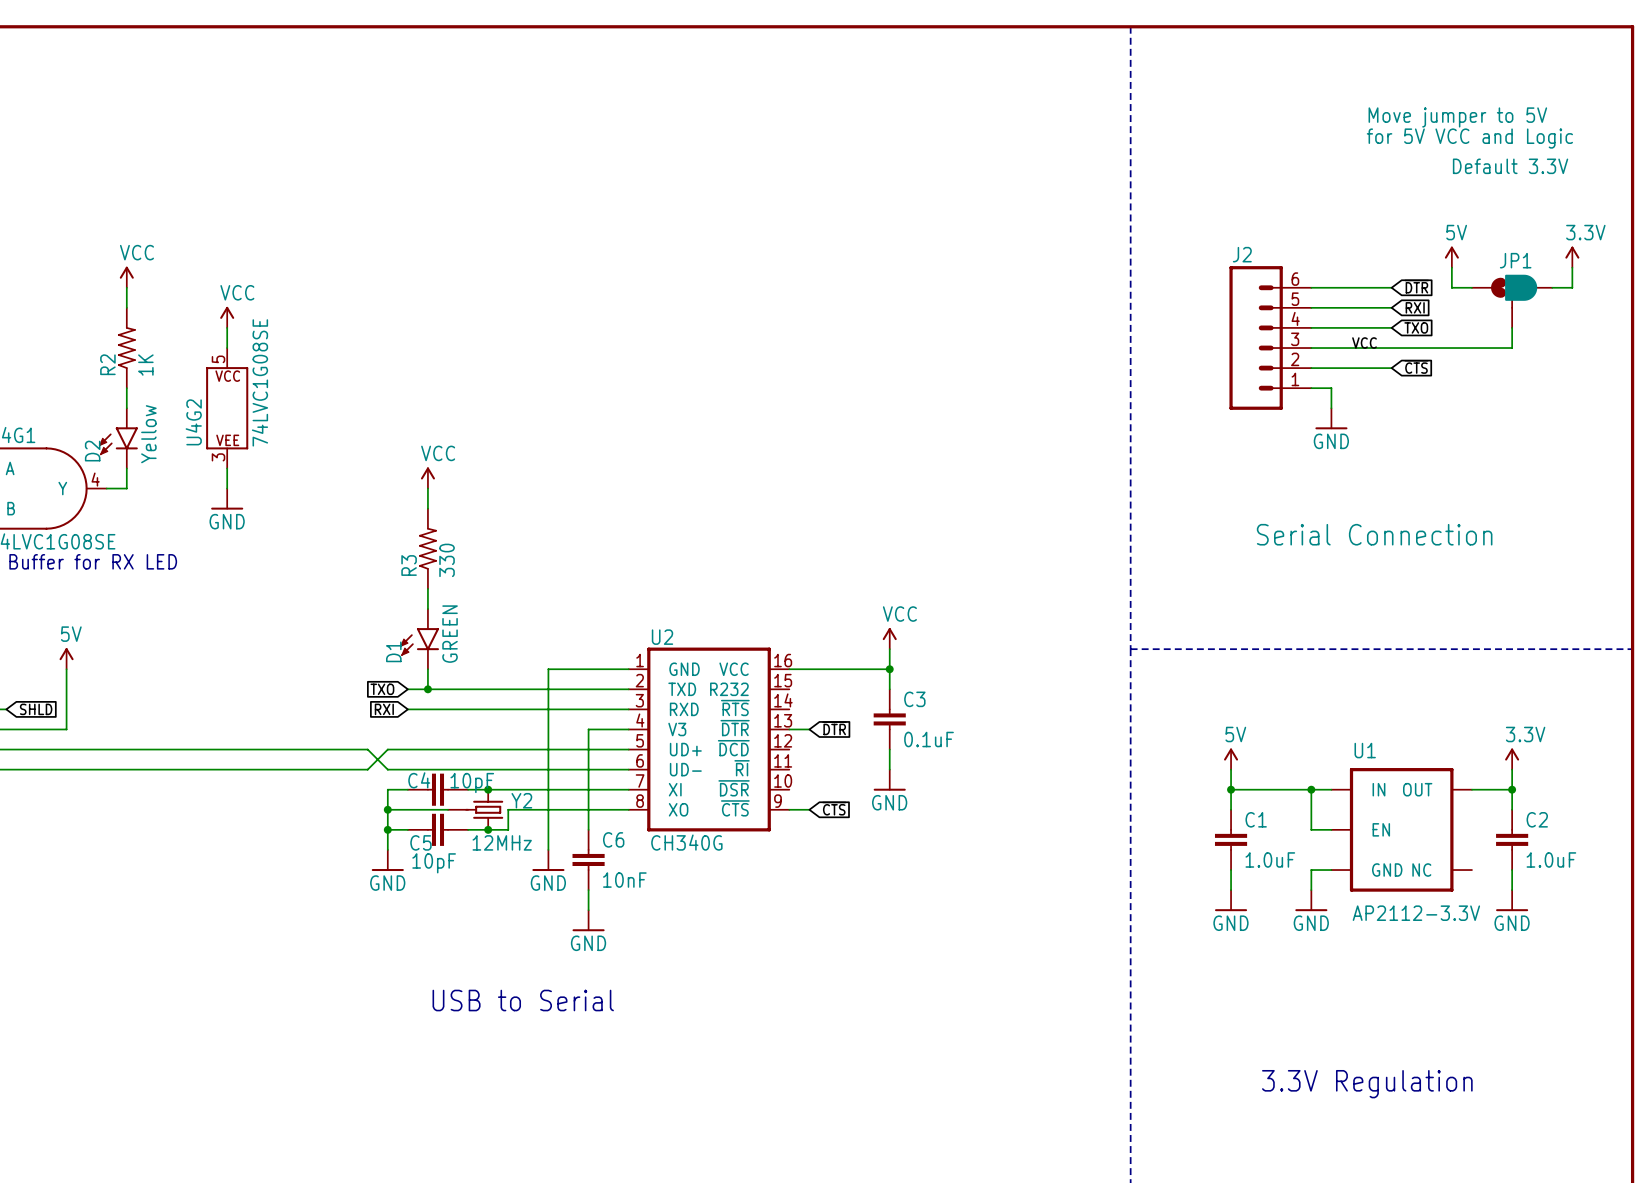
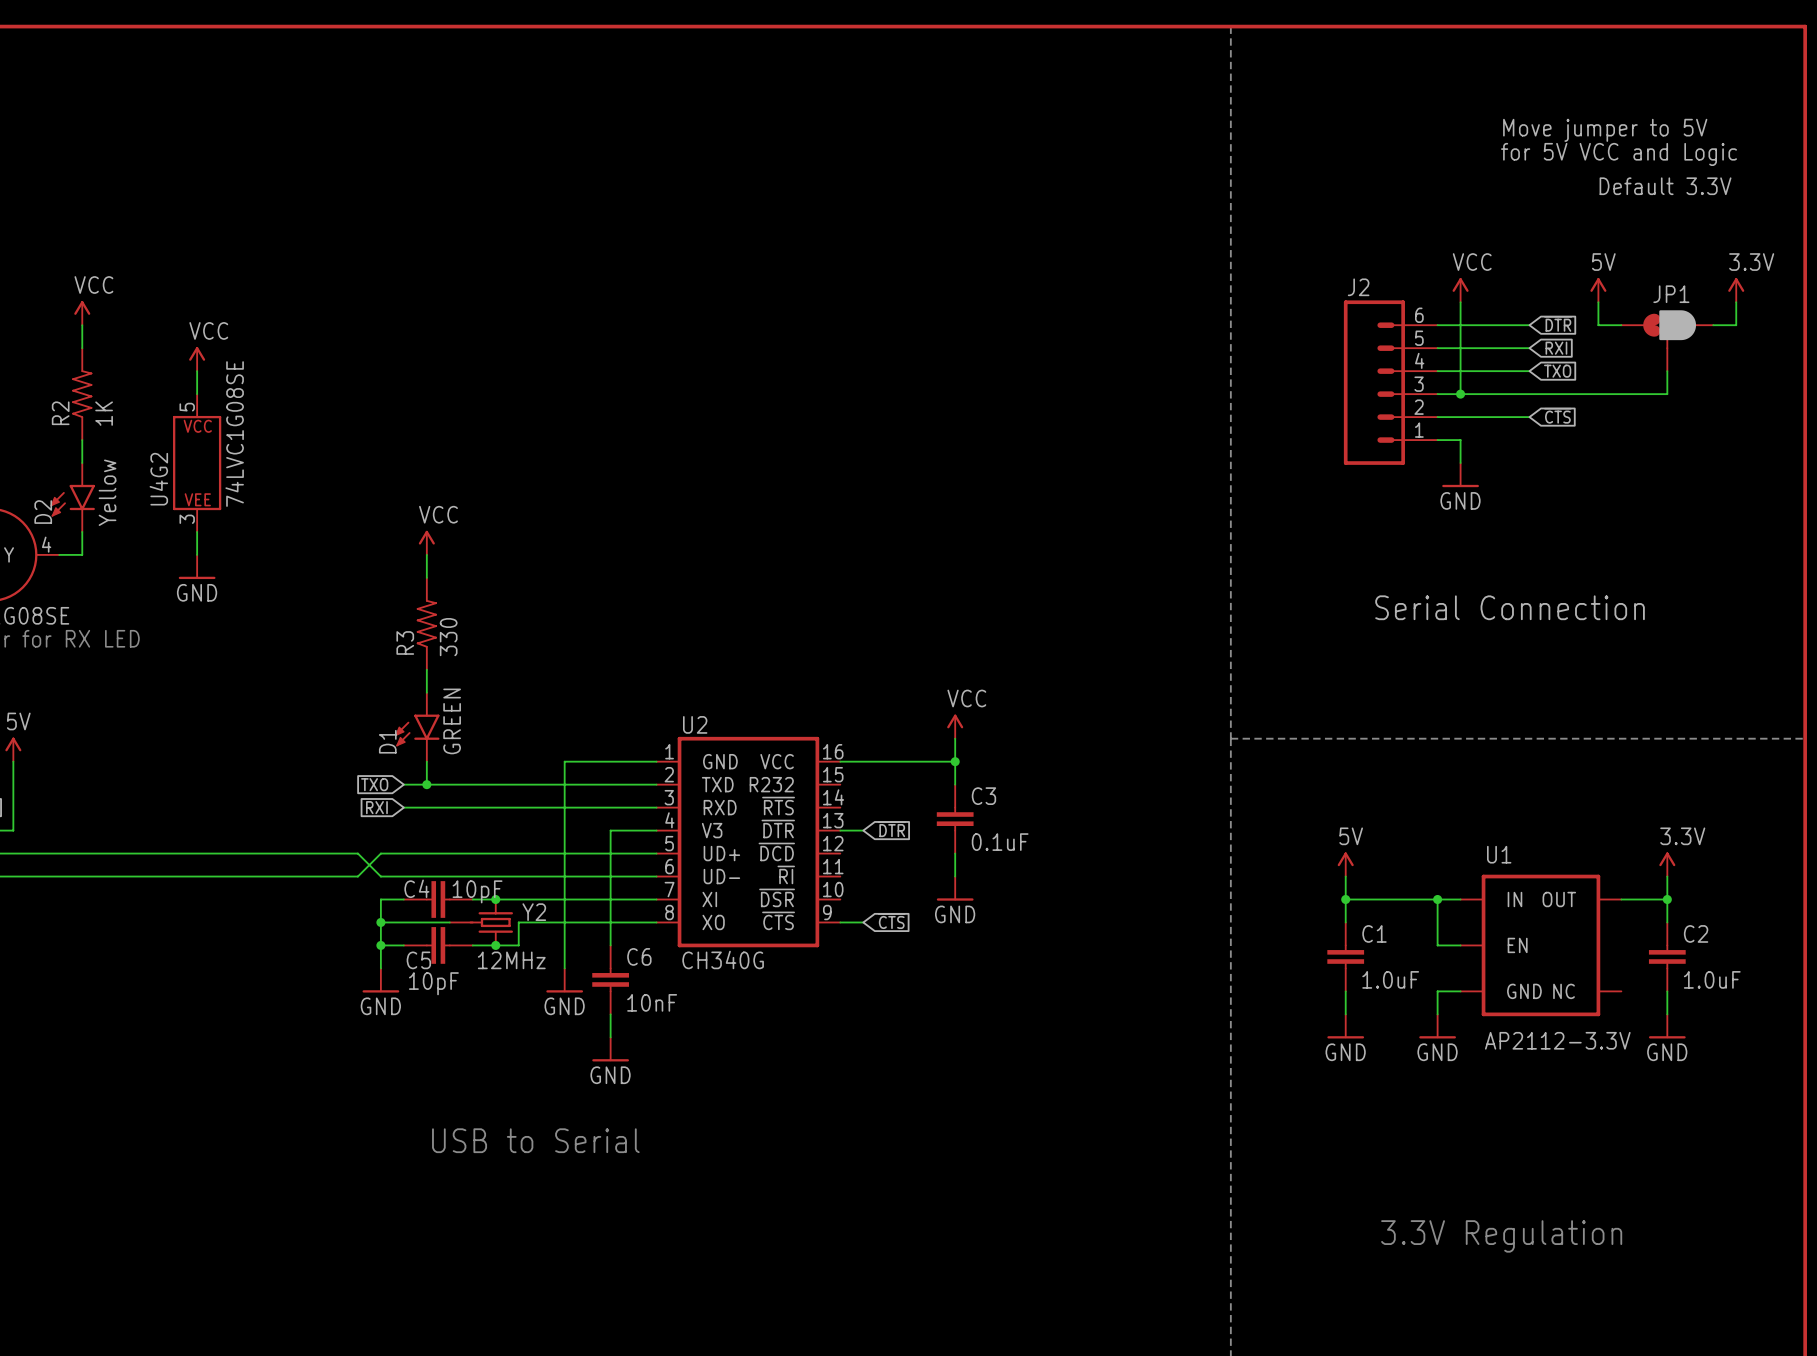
power symbol: none -> VCC (1460, 290)
wire: none -> (1460, 302) (1460, 394)
label: VCC (1364, 342) -> none
junction: none -> (1460, 394)

